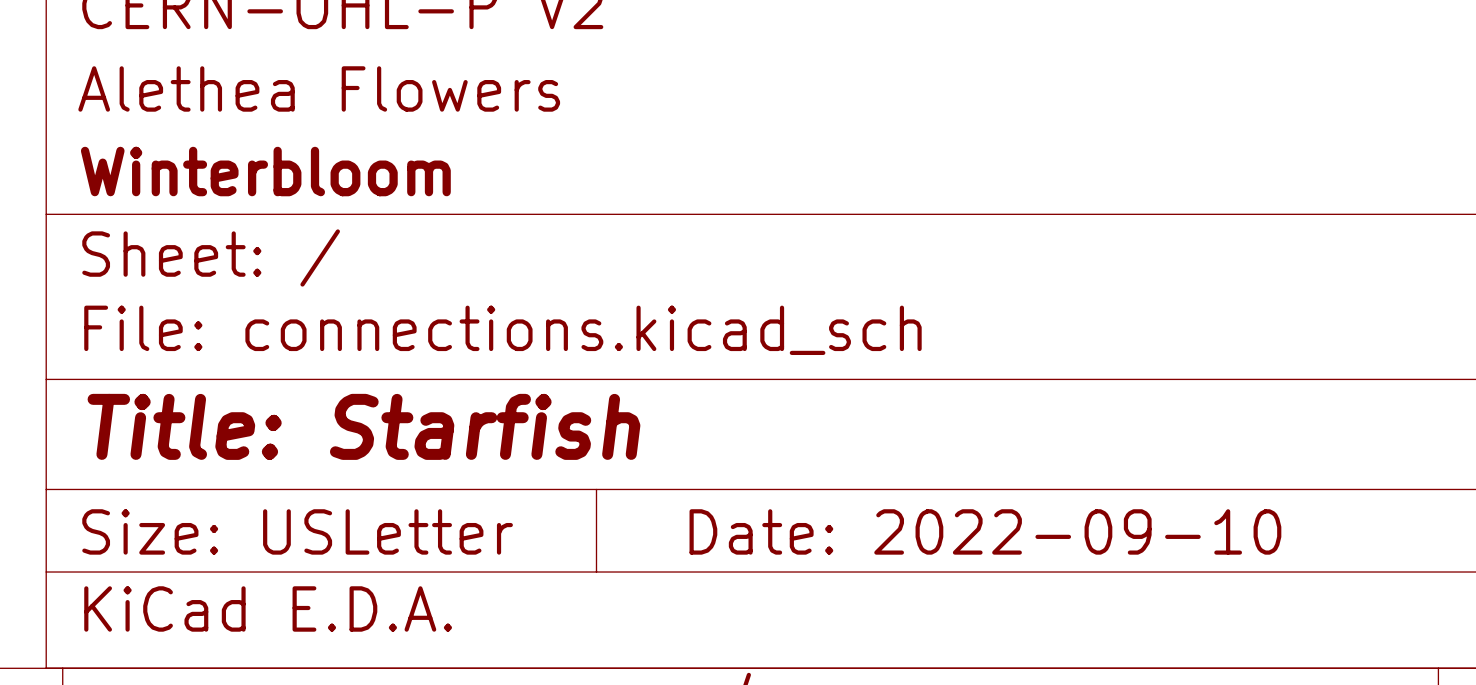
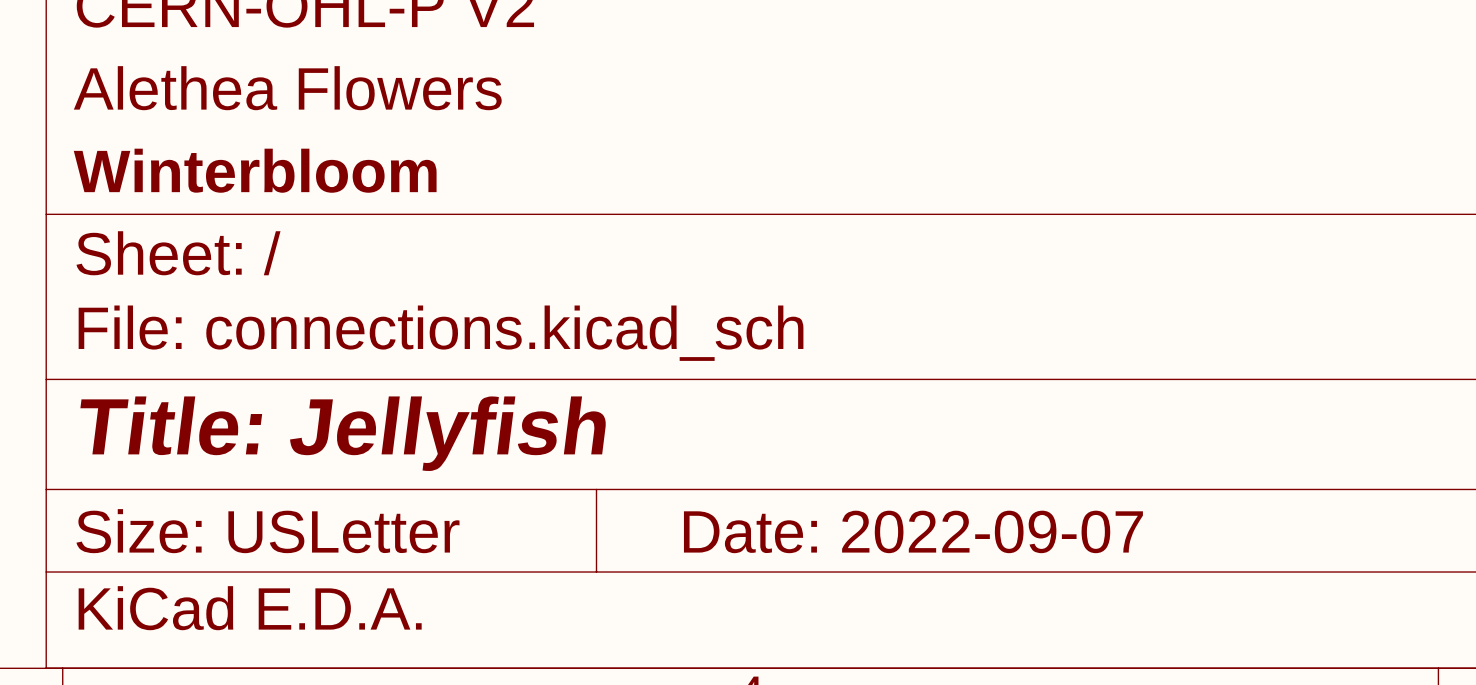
title block: Title: Starfish (363, 426) -> Title: Jellyfish (343, 433)
title block: Date: 2022-09-10 (985, 531) -> Date: 2022-09-07 (913, 531)

